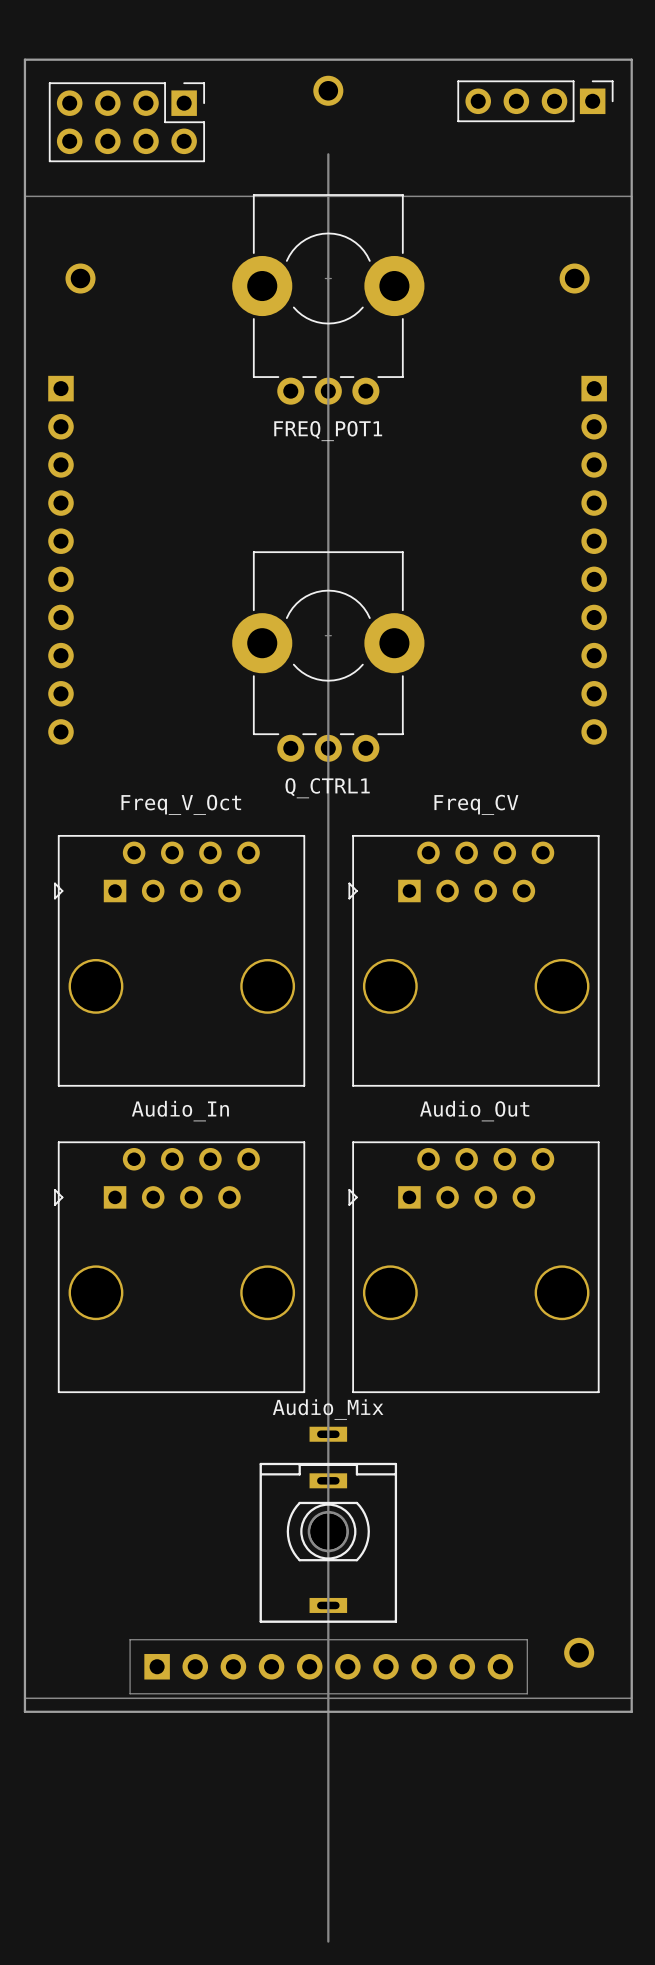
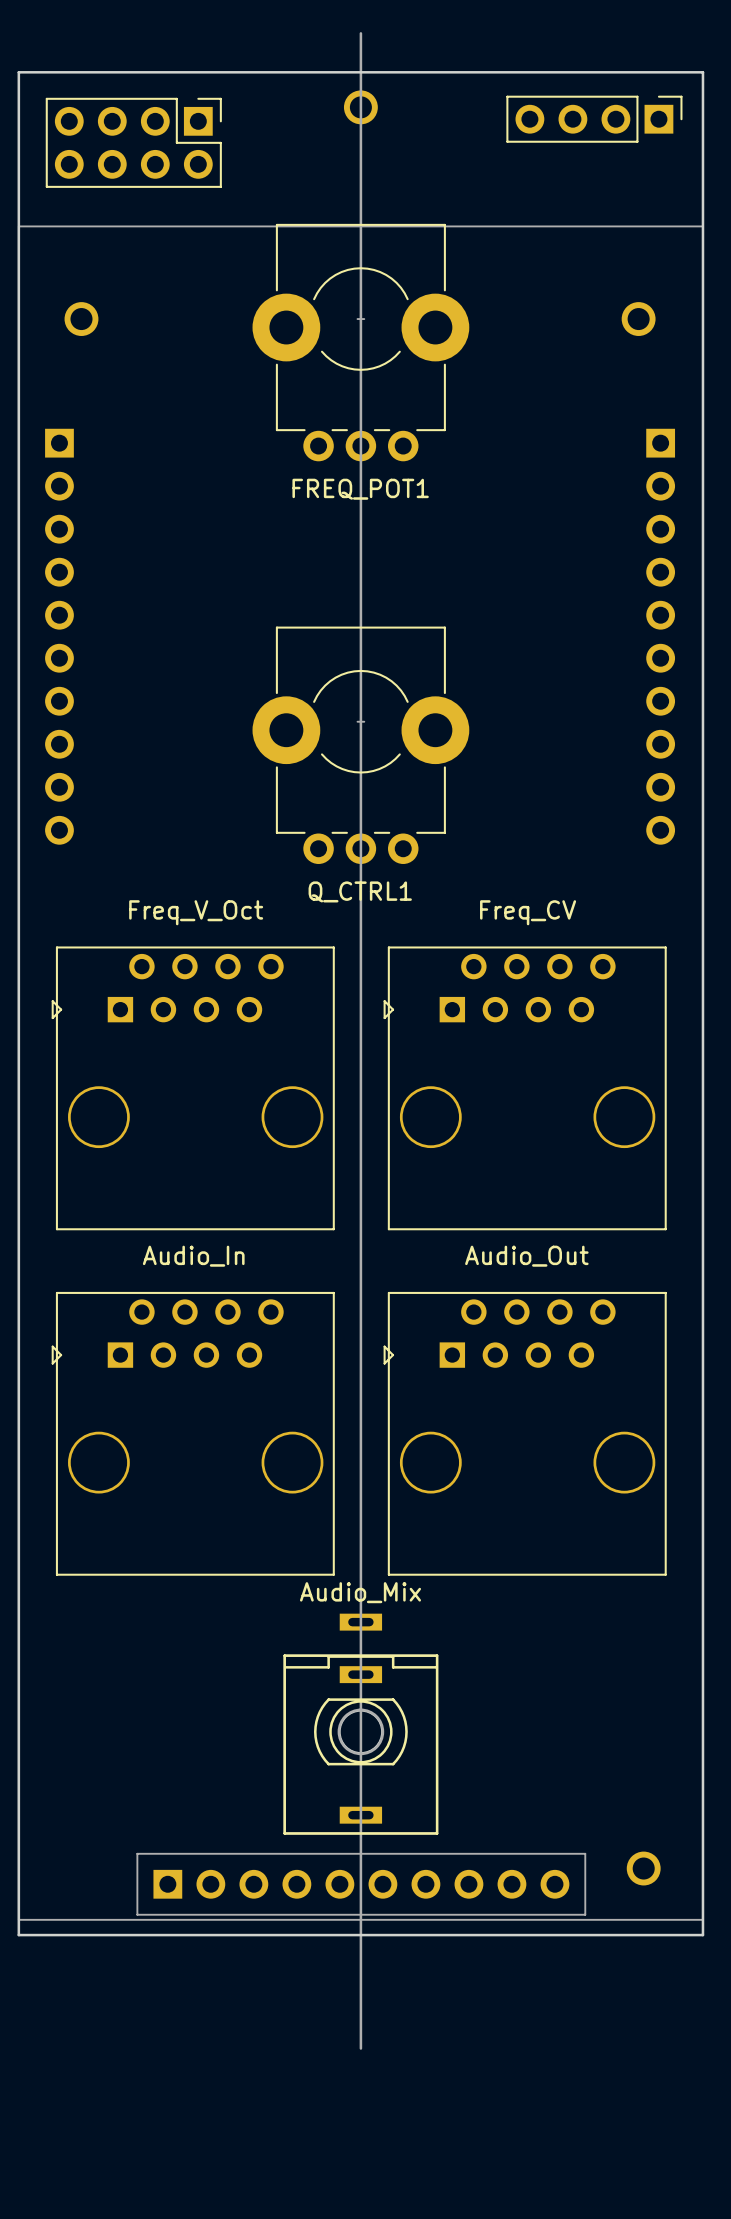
line: none -> (360, 33) (360, 179)
line: (328, 1812) (328, 1941) -> none

